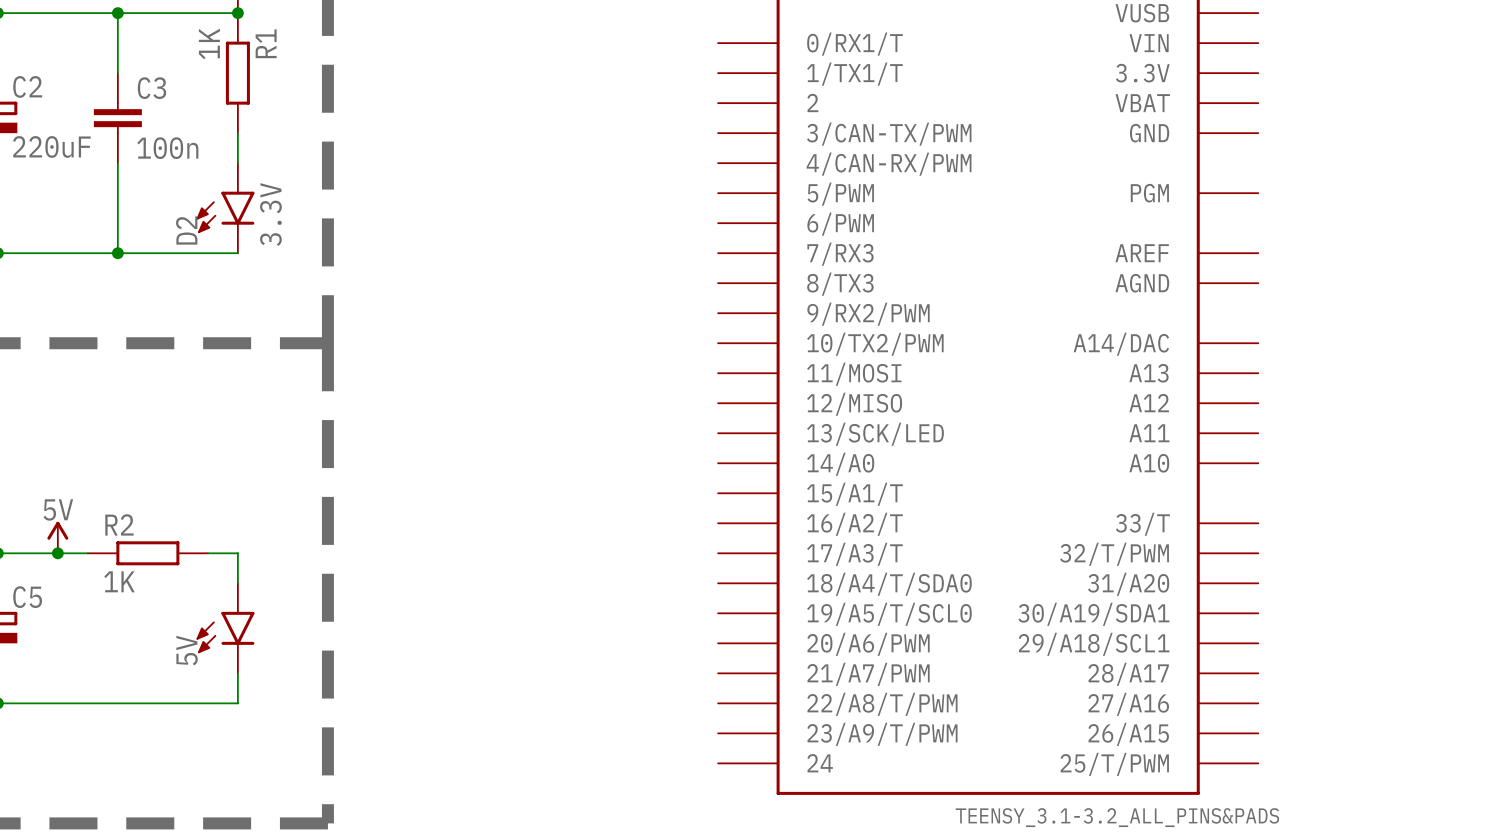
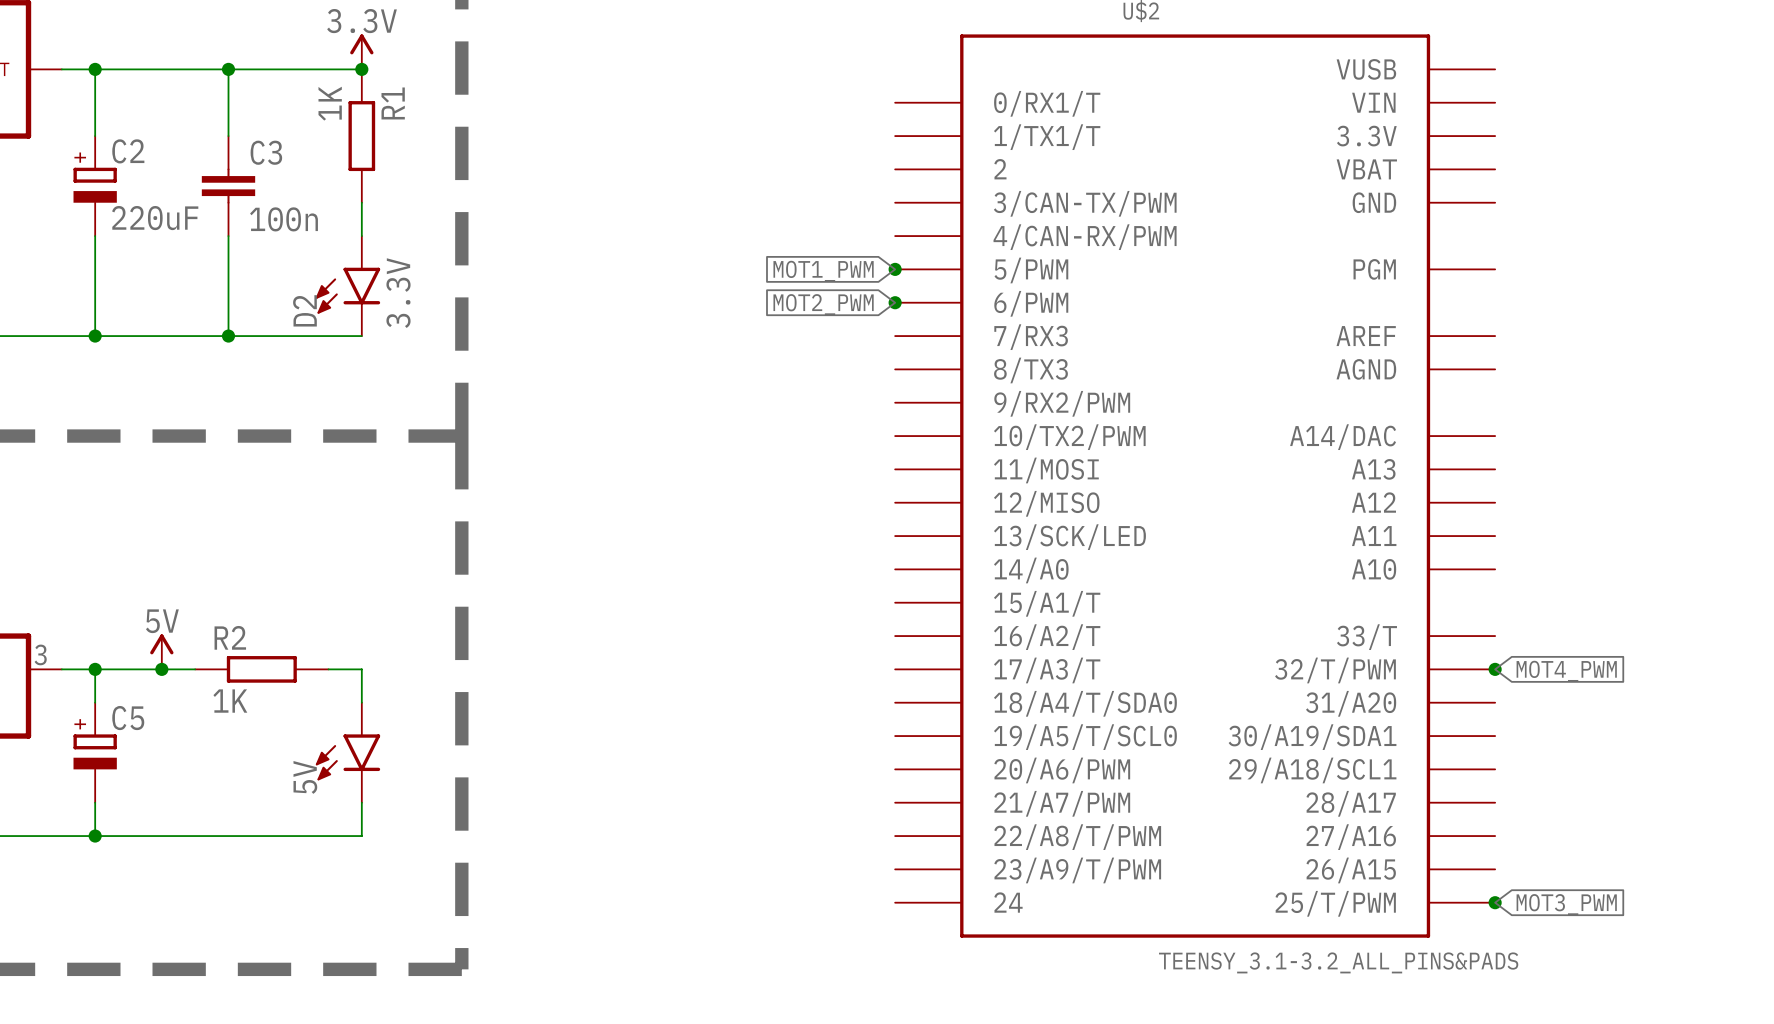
junction: none -> (895, 269)
global label: none -> MOT1_PWM (823, 271)
junction: none -> (895, 302)
global label: none -> MOT2_PWM (823, 304)
junction: none -> (1495, 669)
global label: none -> MOT4_PWM (1566, 671)
junction: none -> (1495, 902)
global label: none -> MOT3_PWM (1566, 904)

